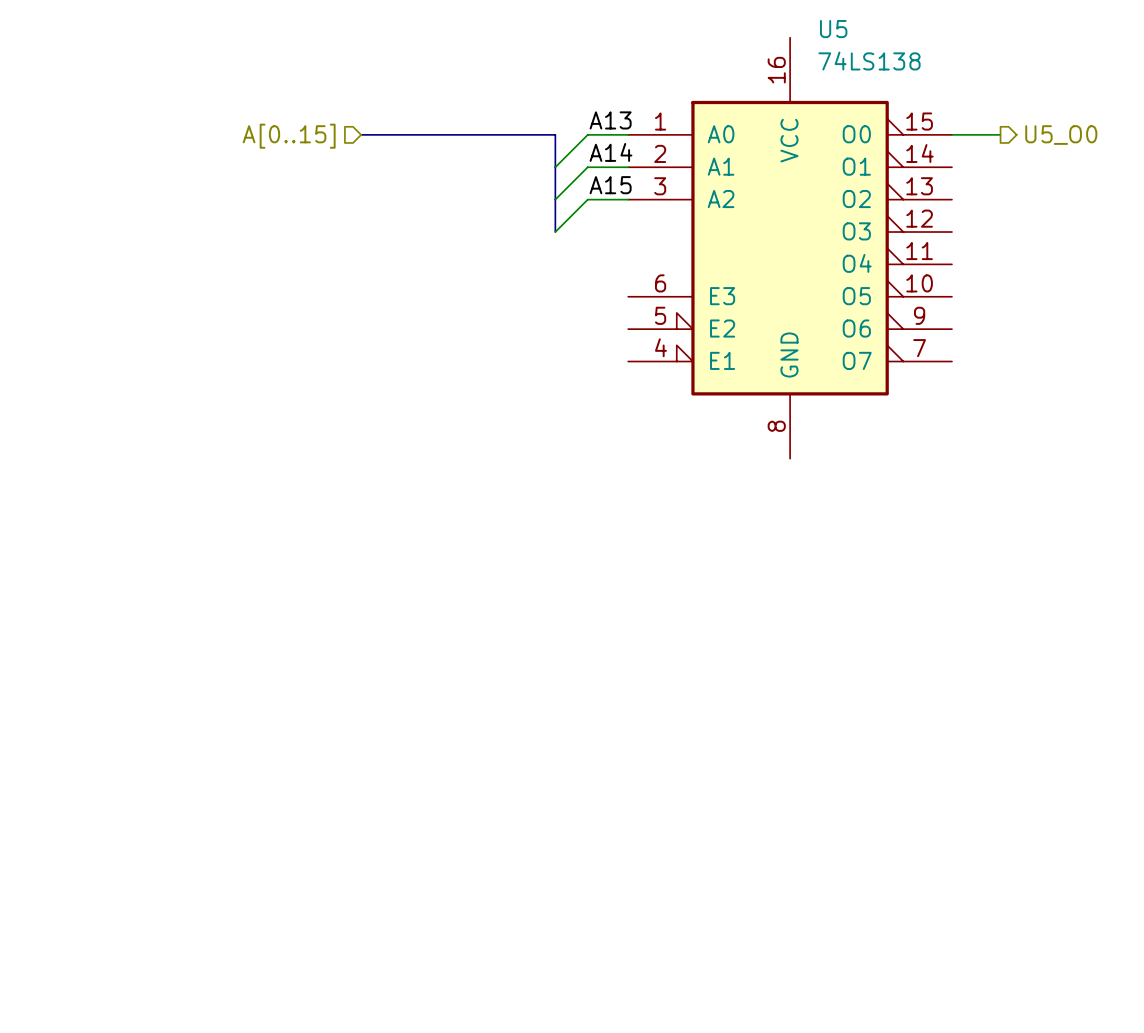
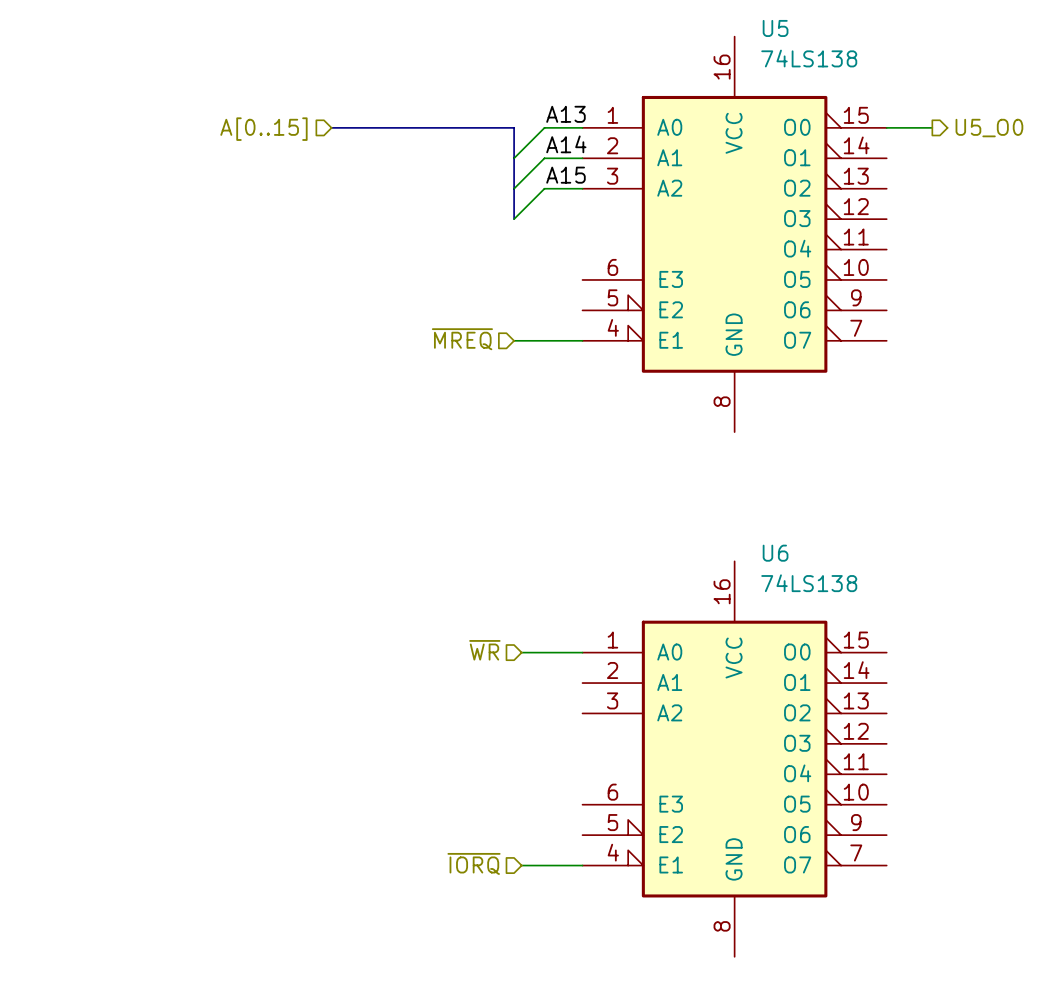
hierarchical label: none -> ~{MREQ} (462, 339)
wire: none -> (514, 340) (582, 340)
hierarchical label: none -> ~{WR} (484, 650)
wire: none -> (521, 652) (582, 652)
U6: none -> 74LS138 (734, 759)
hierarchical label: none -> ~{IORQ} (474, 863)
wire: none -> (521, 865) (582, 865)

